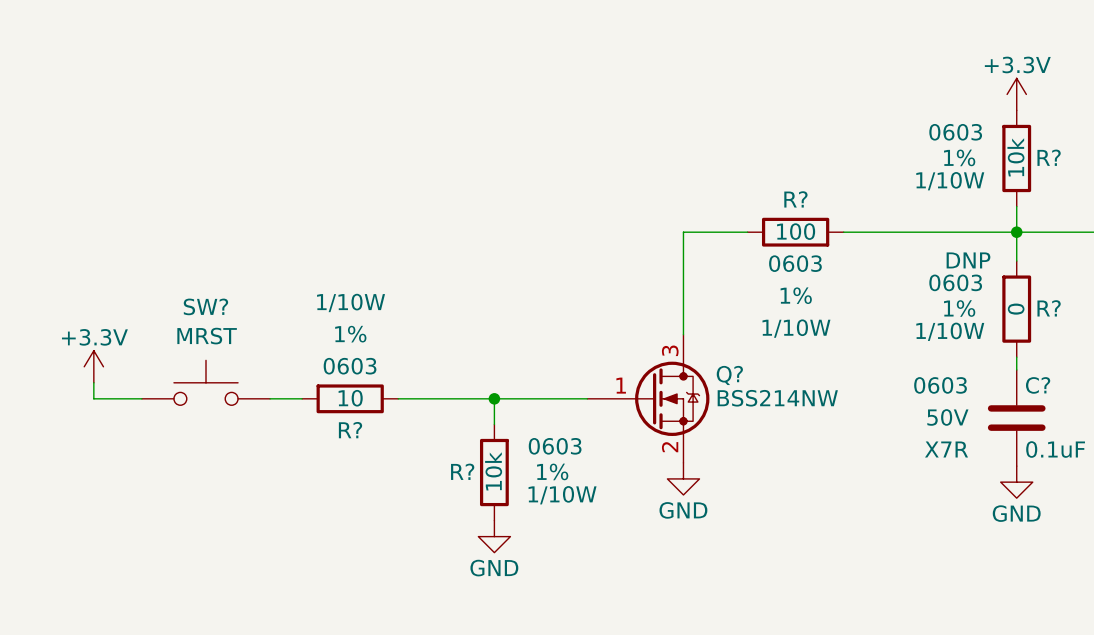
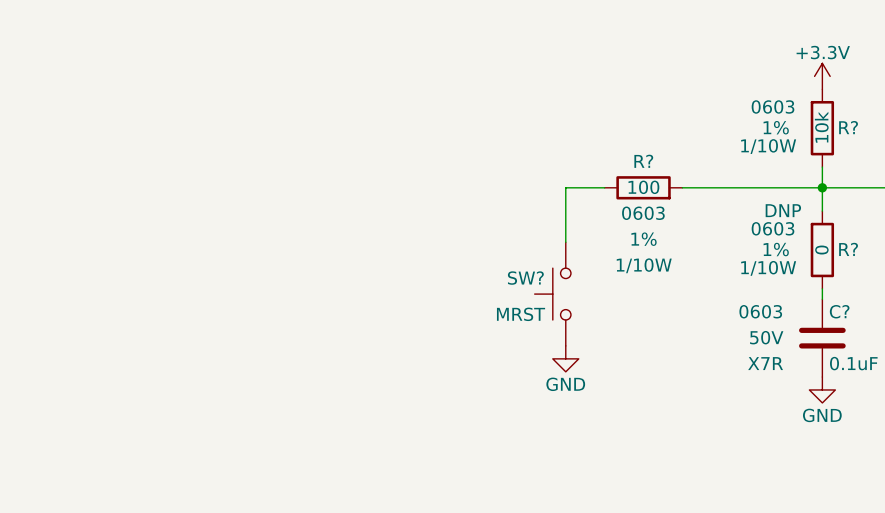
wire: (699, 232) (683, 232) (683, 334) -> (565, 187) (565, 242)
SW?: none -> MRST (552, 294)
power symbol: +3.3V (93, 366) -> none
wire: (93, 382) (93, 398) (141, 398) -> none
SW?: MRST (206, 382) -> none
wire: (270, 398) (302, 398) -> none
R?: 10 (350, 398) -> none
wire: (398, 398) (587, 398) -> none
wire: (494, 398) (494, 424) -> none
junction: (494, 398) -> none
Q?: BSS214NW (648, 398) -> none
R?: 10k (494, 472) -> none
power symbol position: GND (683, 478) -> GND (565, 358)
power symbol: GND (494, 536) -> none

